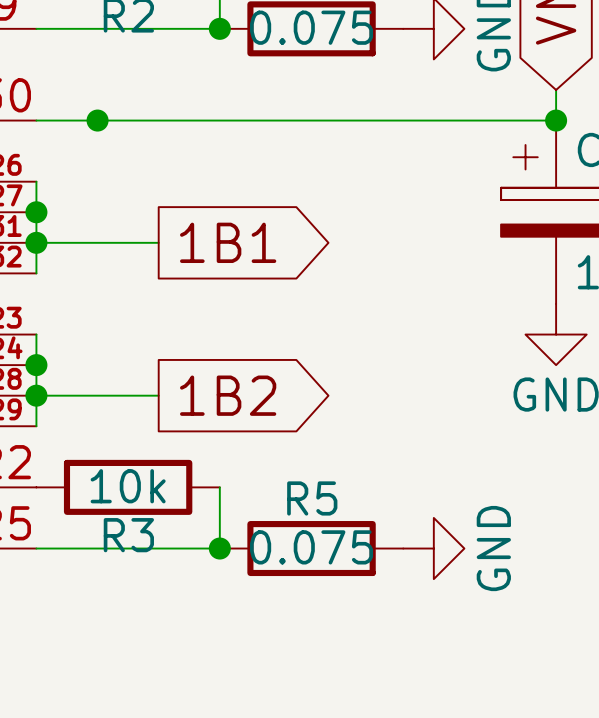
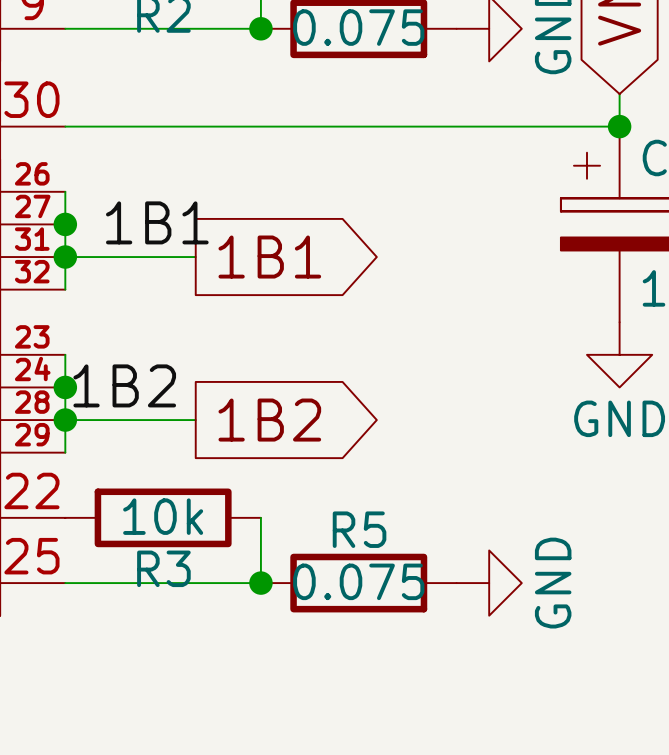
junction: (97, 120) -> none
label: none -> 1B1 (157, 222)
label: none -> 1B2 (124, 385)

